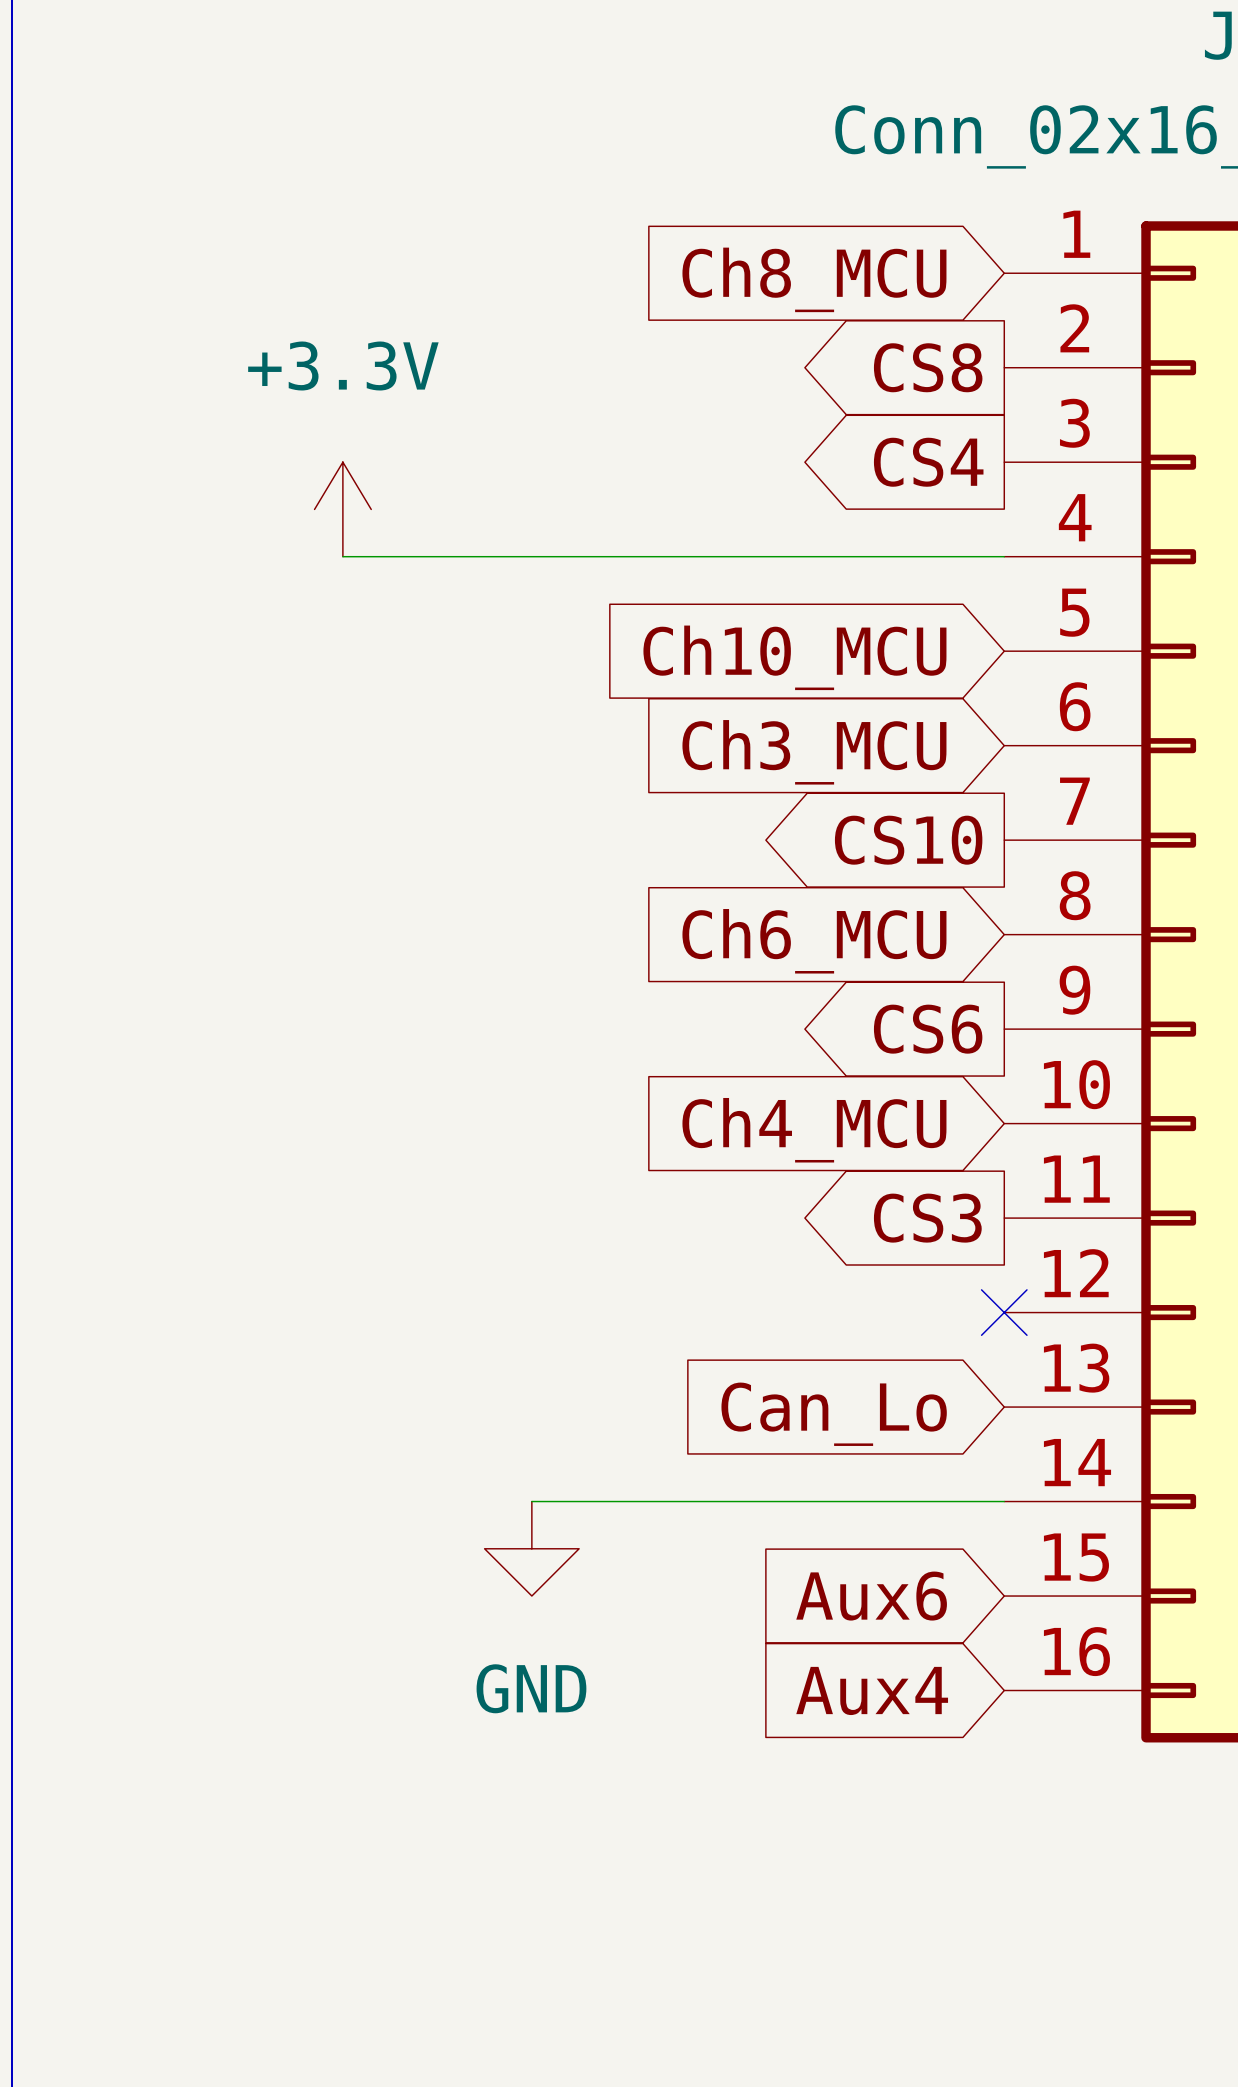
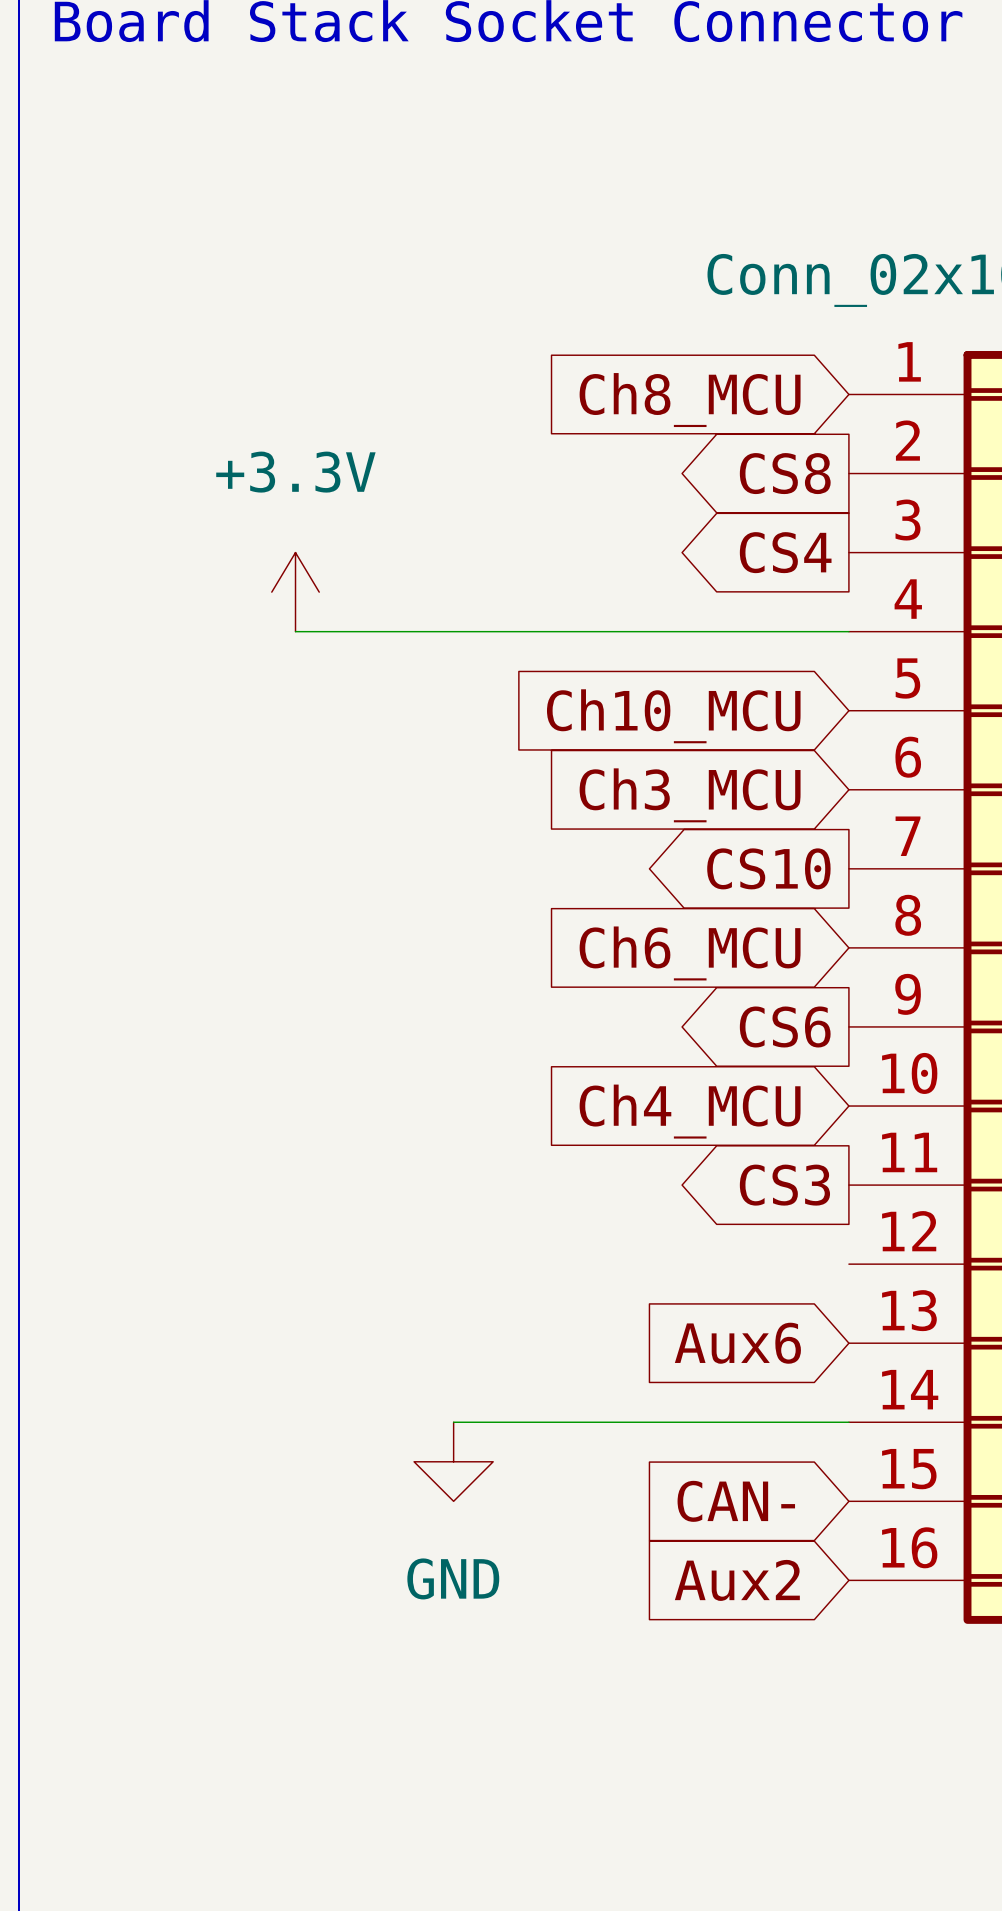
no-connect mark: (1004, 1312) -> none
global label: Can_Lo (834, 1414) -> Aux6 (737, 1343)
global label: Aux6 (871, 1596) -> CAN- (736, 1501)
global label: Aux4 (872, 1690) -> Aux2 (737, 1580)

